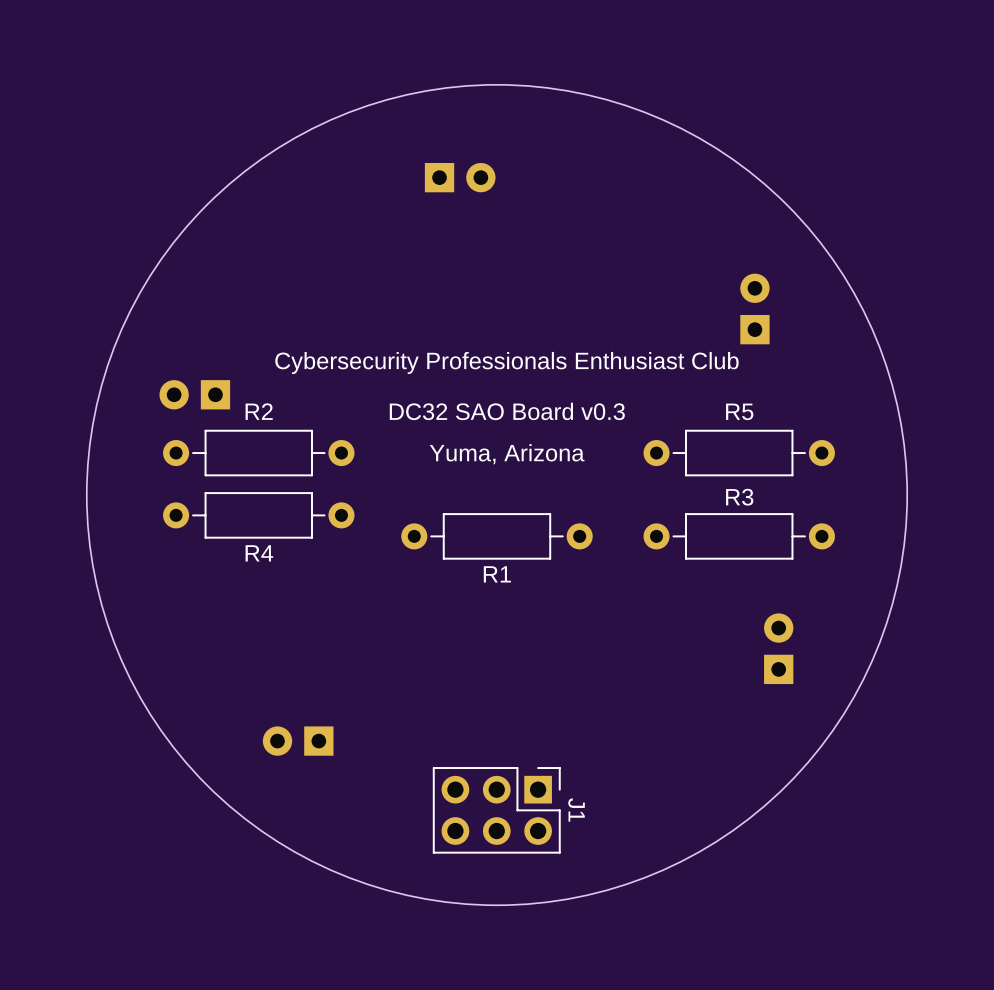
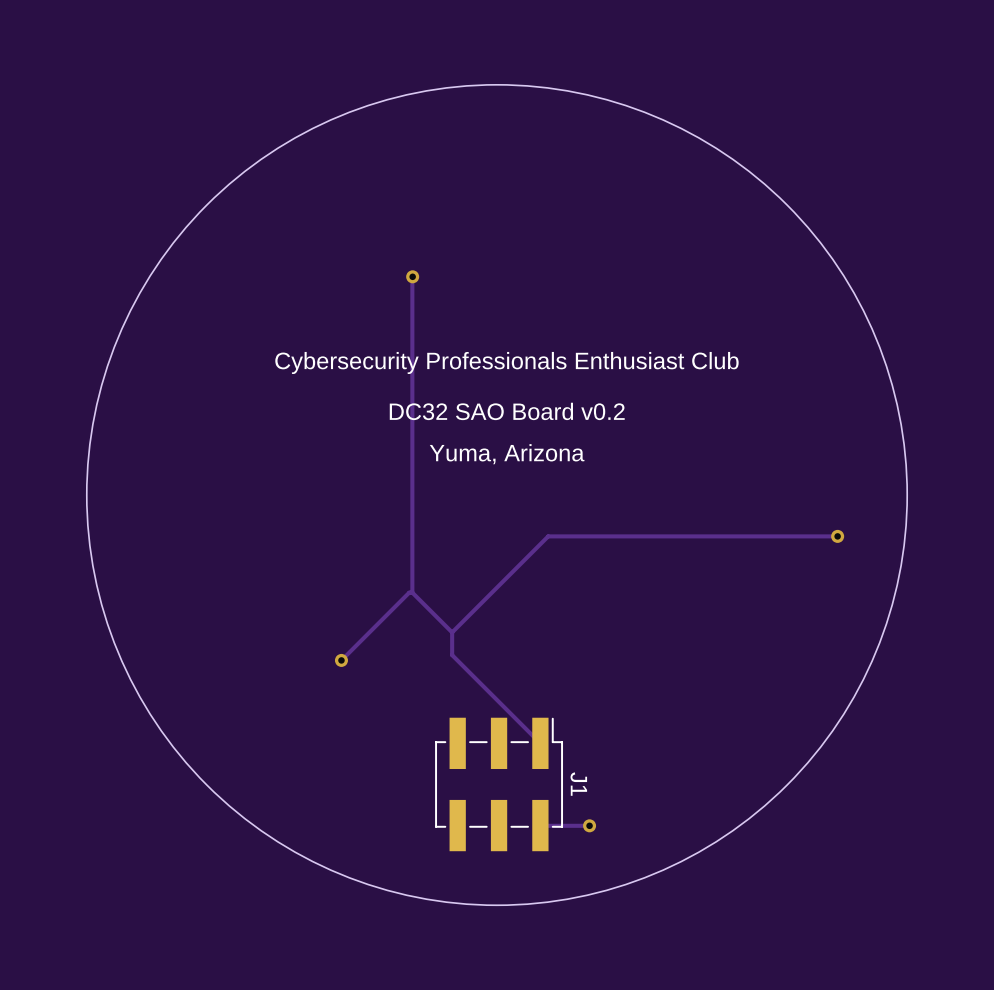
part: (460, 177) -> none
track: none -> (412, 276) (412, 592)
via: none -> (412, 276)
part: (754, 308) -> none
part: (194, 394) -> none
text: DC32 SAO Board v0.3 (507, 411) -> DC32 SAO Board v0.2 (507, 411)
R2: (258, 453) -> none
R5: (739, 453) -> none
R4: (258, 515) -> none
R1: (496, 536) -> none
R3: (739, 536) -> none
track: none -> (837, 536) (548, 536) (452, 632)
via: none -> (837, 536)
track: none -> (412, 592) (409, 592) (341, 660)
track: none -> (412, 592) (452, 632)
track: none -> (452, 632) (452, 655) (540, 743)
part: (778, 648) -> none
via: none -> (341, 660)
part: (298, 741) -> none
J1 footprint: [432, 767, 561, 854] -> [435, 717, 564, 852]
track: none -> (589, 825) (548, 825)
via: none -> (589, 825)

